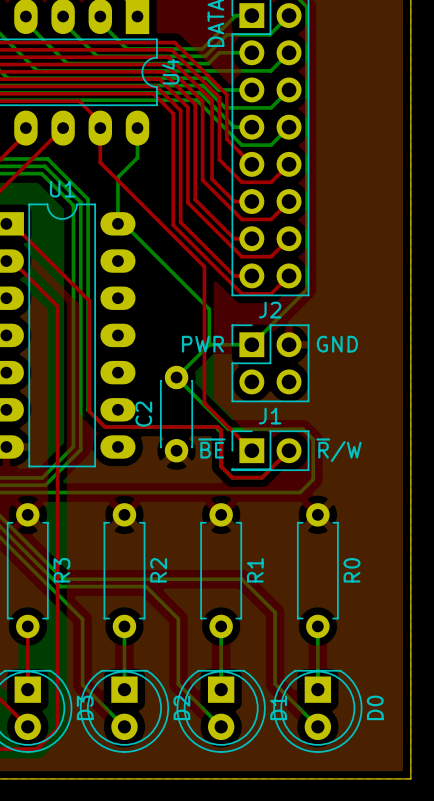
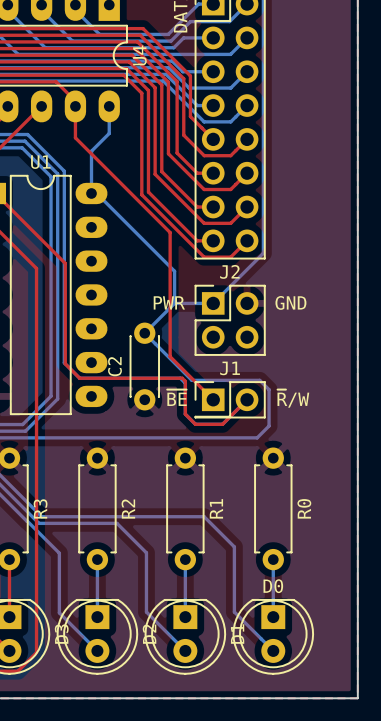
D0 name rotation: 0° (375, 707) -> 90° clockwise (273, 586)
D0 name position: D0 (375, 707) -> D0 (273, 586)

